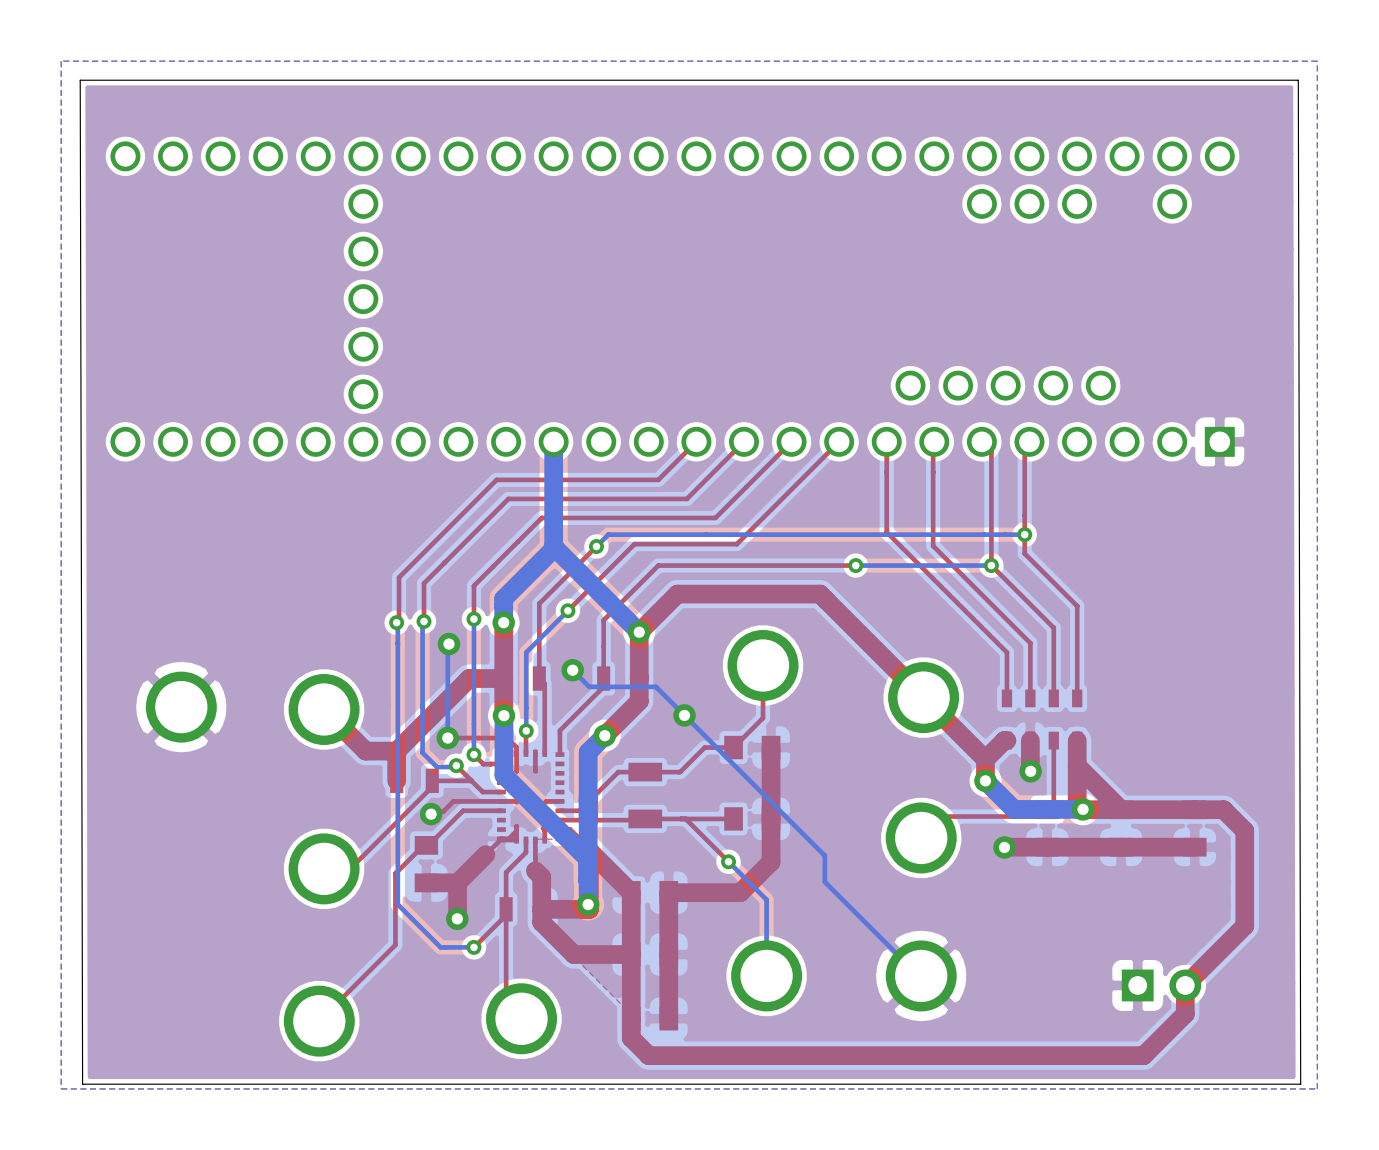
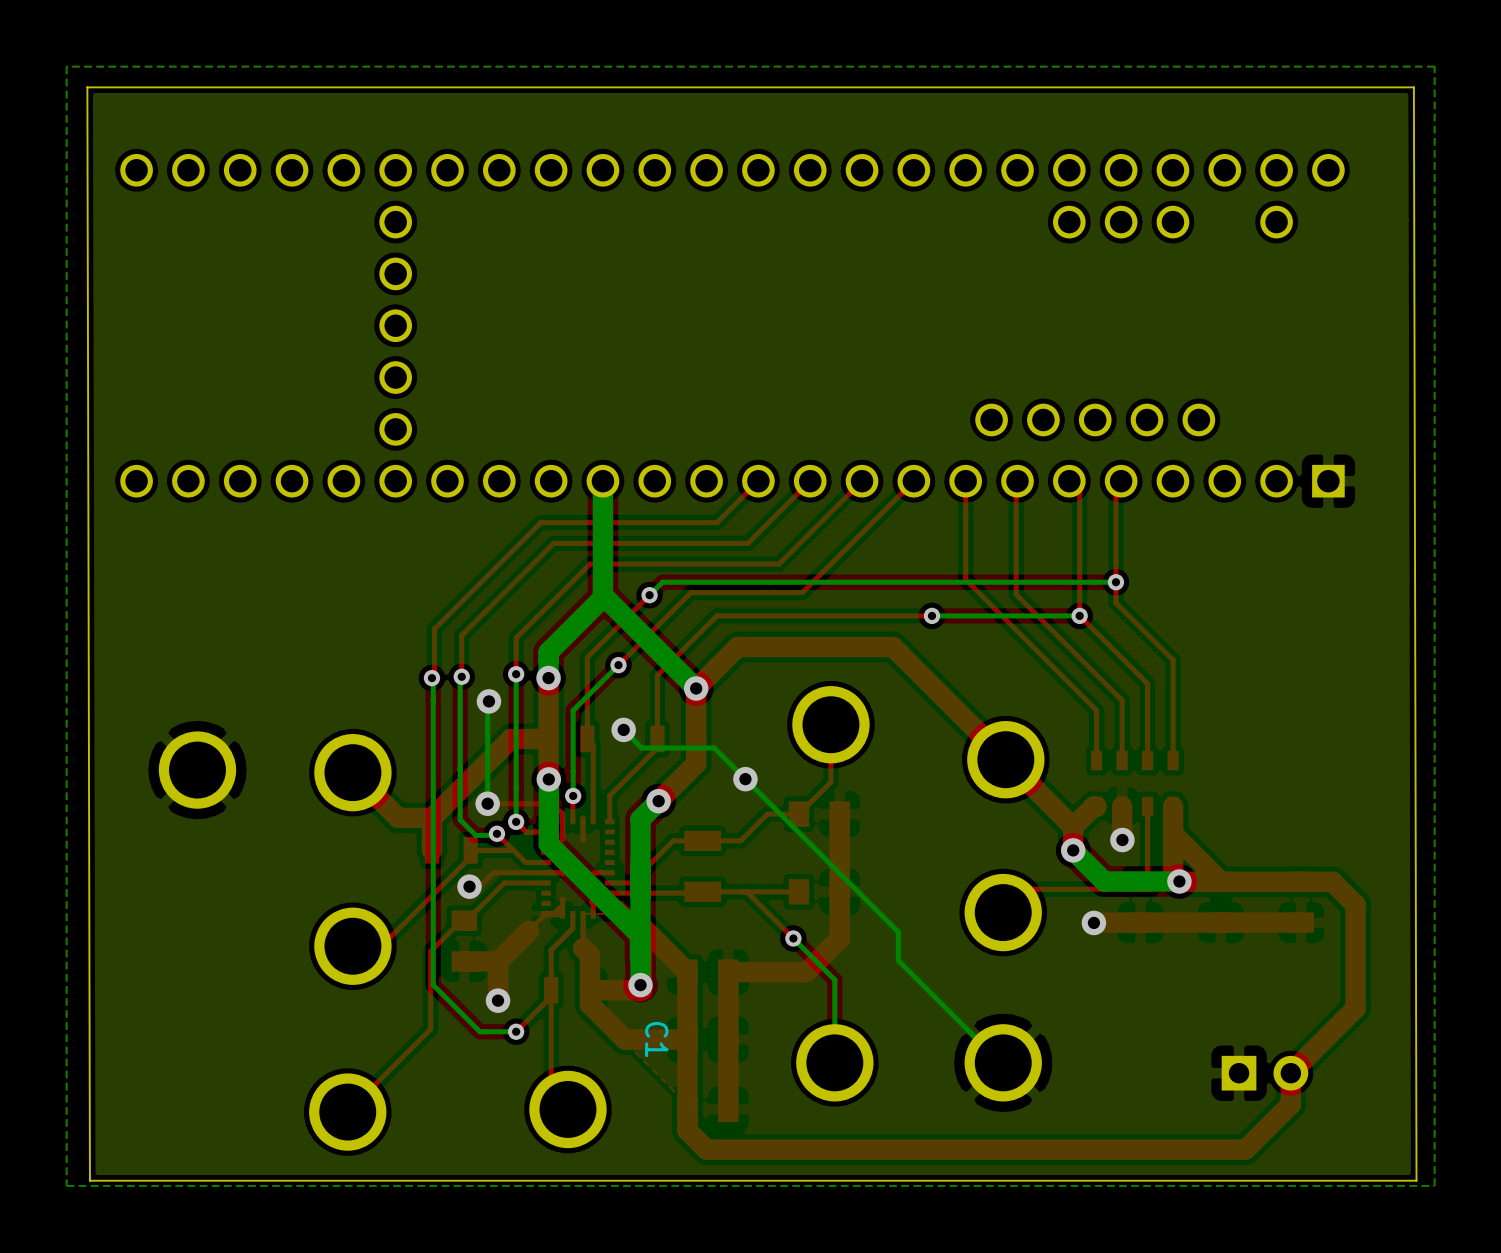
C1 name: none -> C1 (656, 1039)

